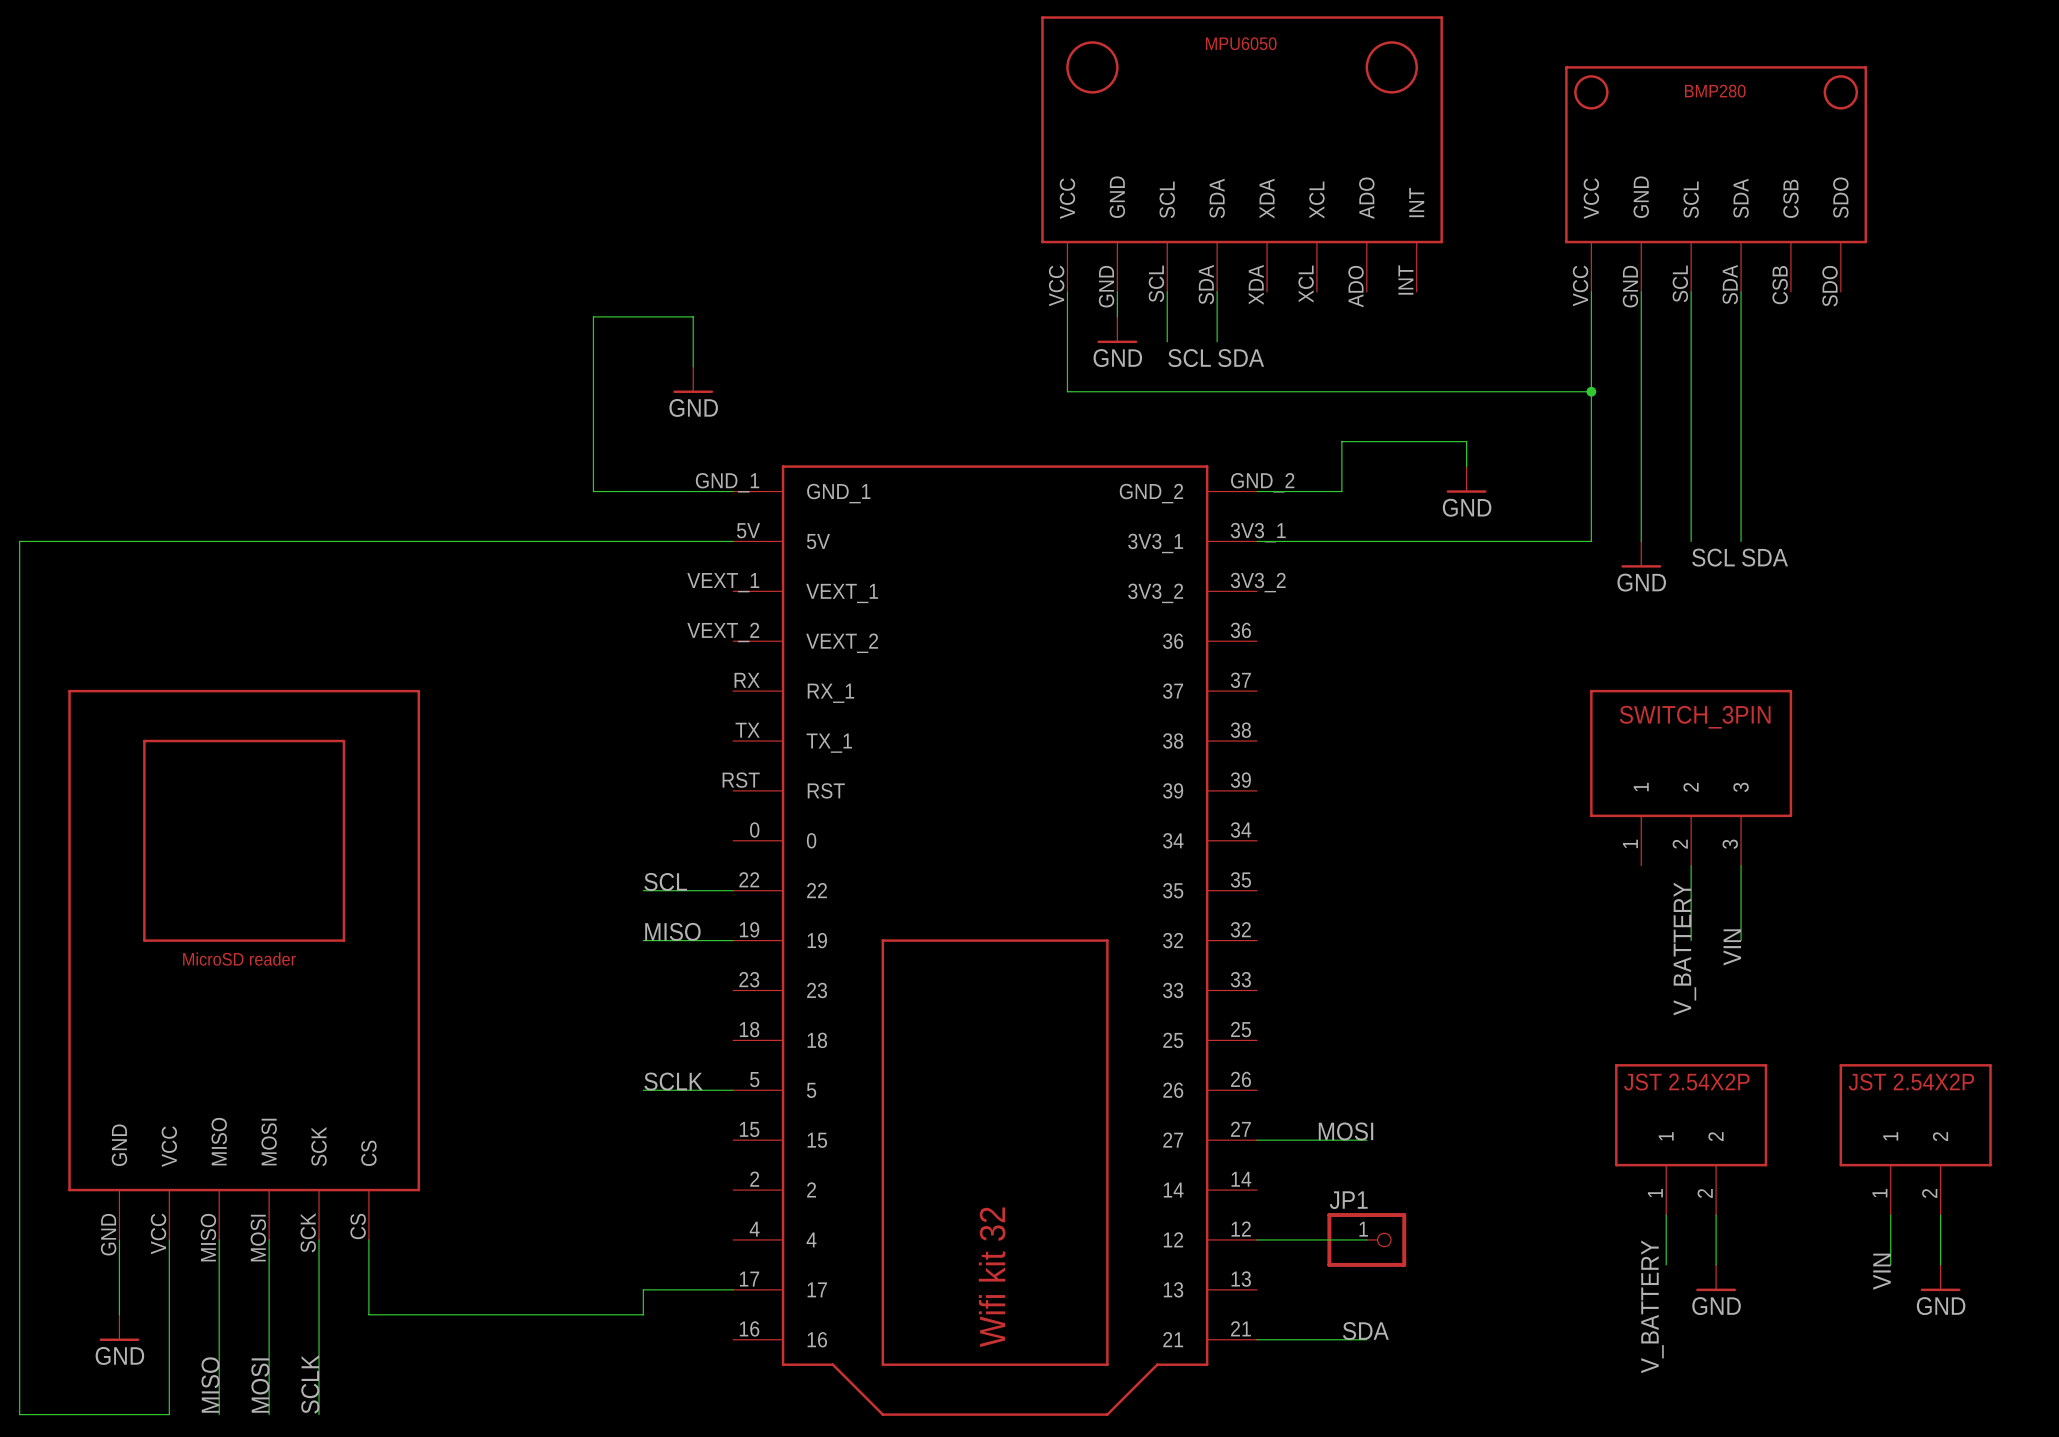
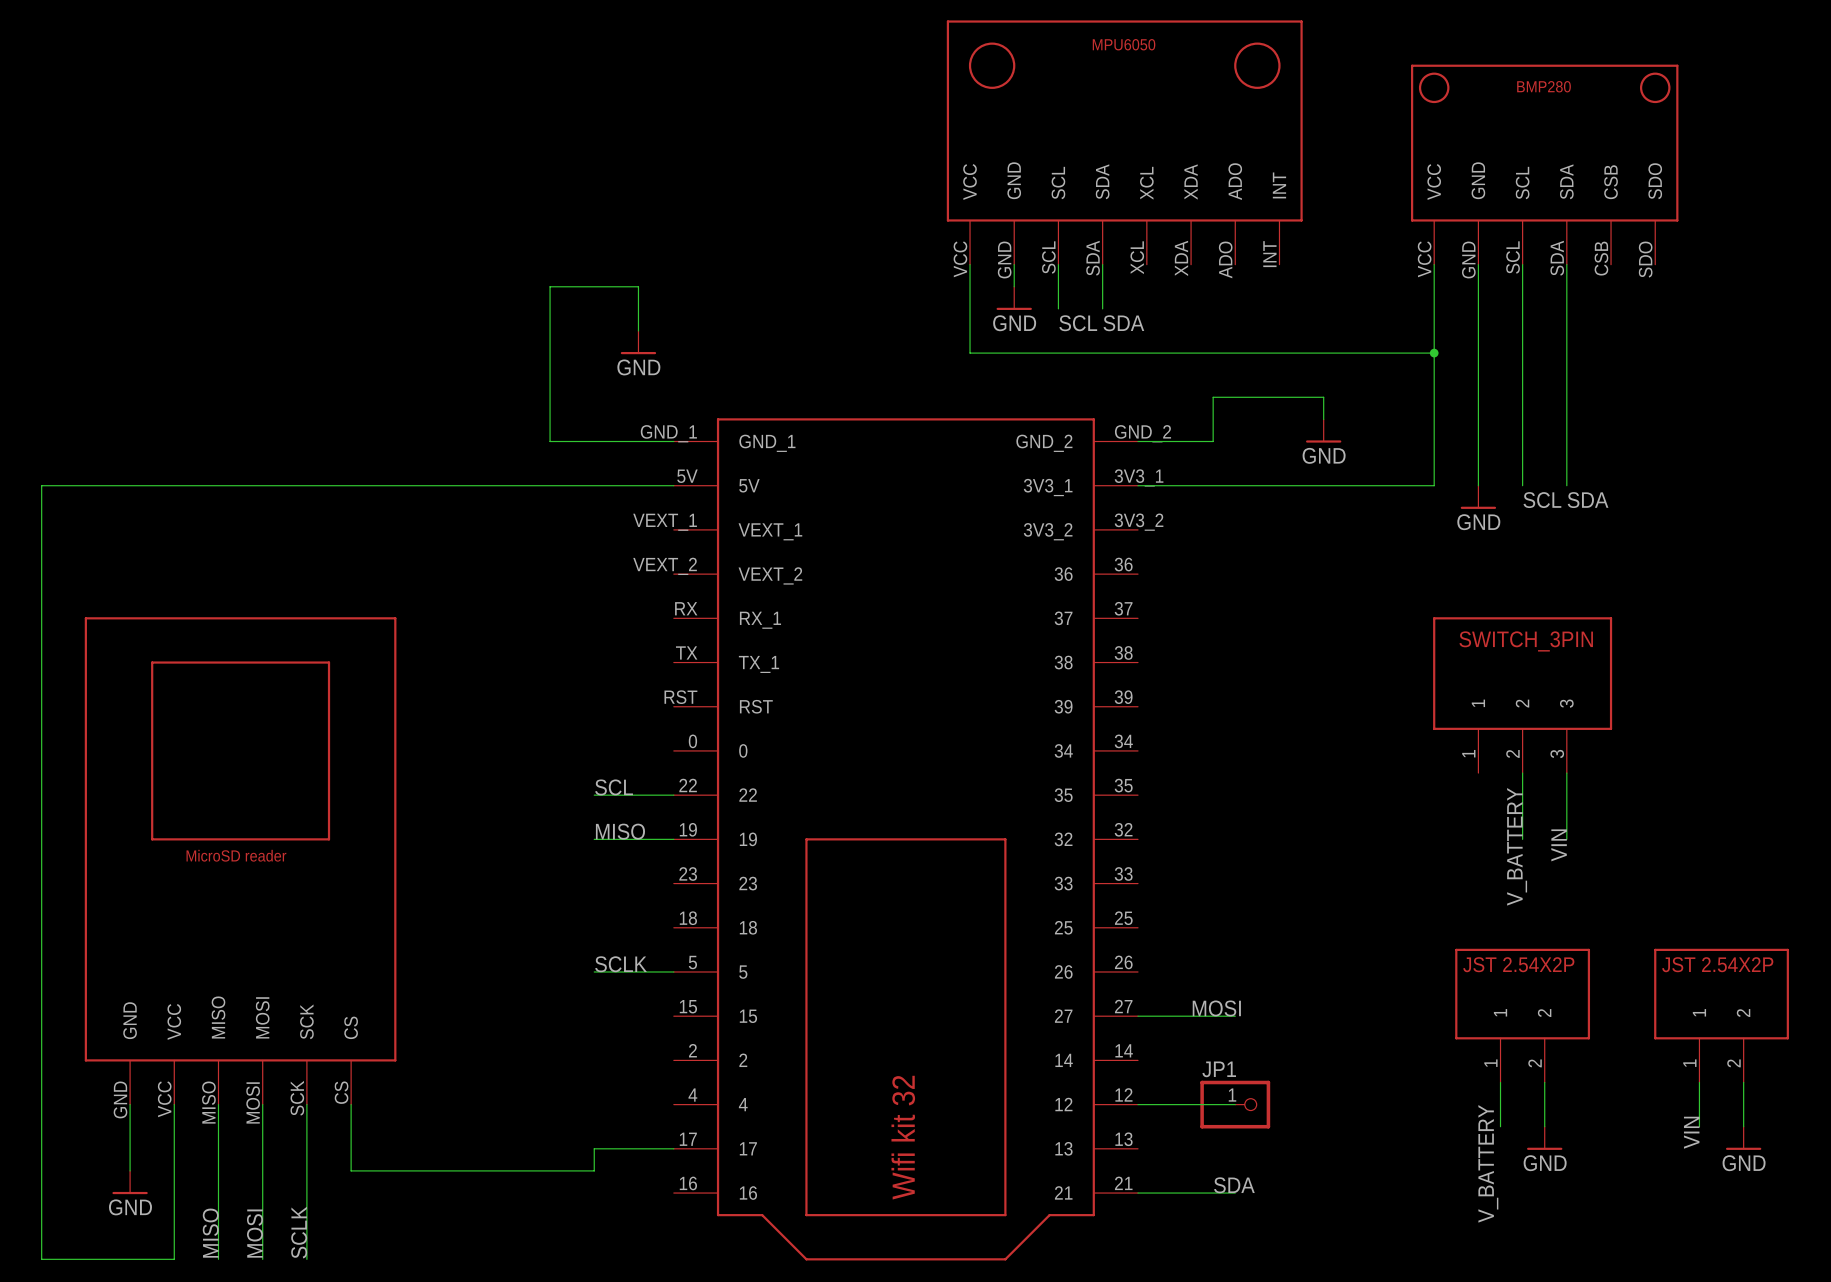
part pin name: XDA (1267, 198) -> XCL (1146, 183)
part pin name: XCL (1316, 200) -> XDA (1191, 182)
part pin number: XDA (1256, 284) -> XCL (1137, 257)
part pin number: XCL (1306, 284) -> XDA (1181, 258)

